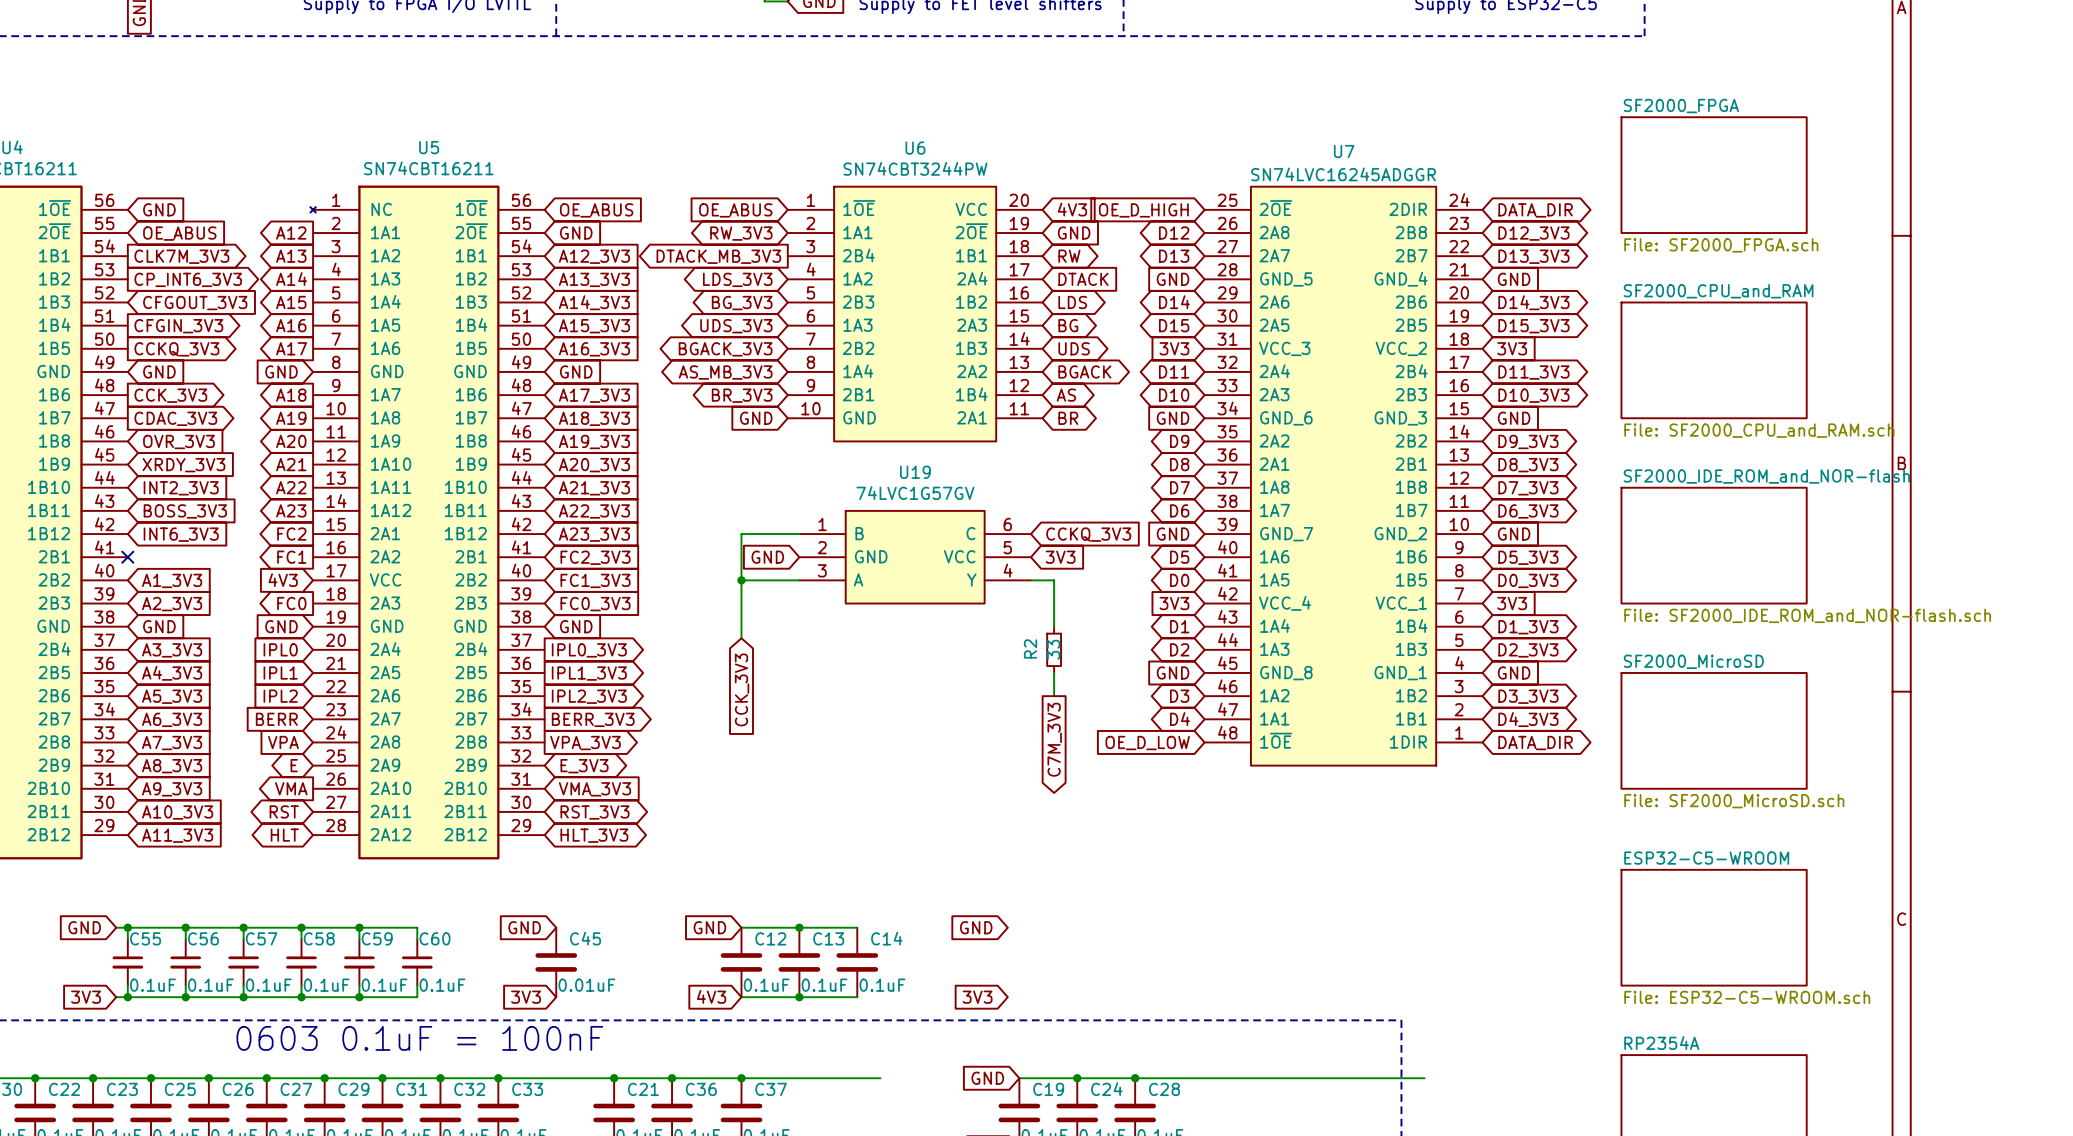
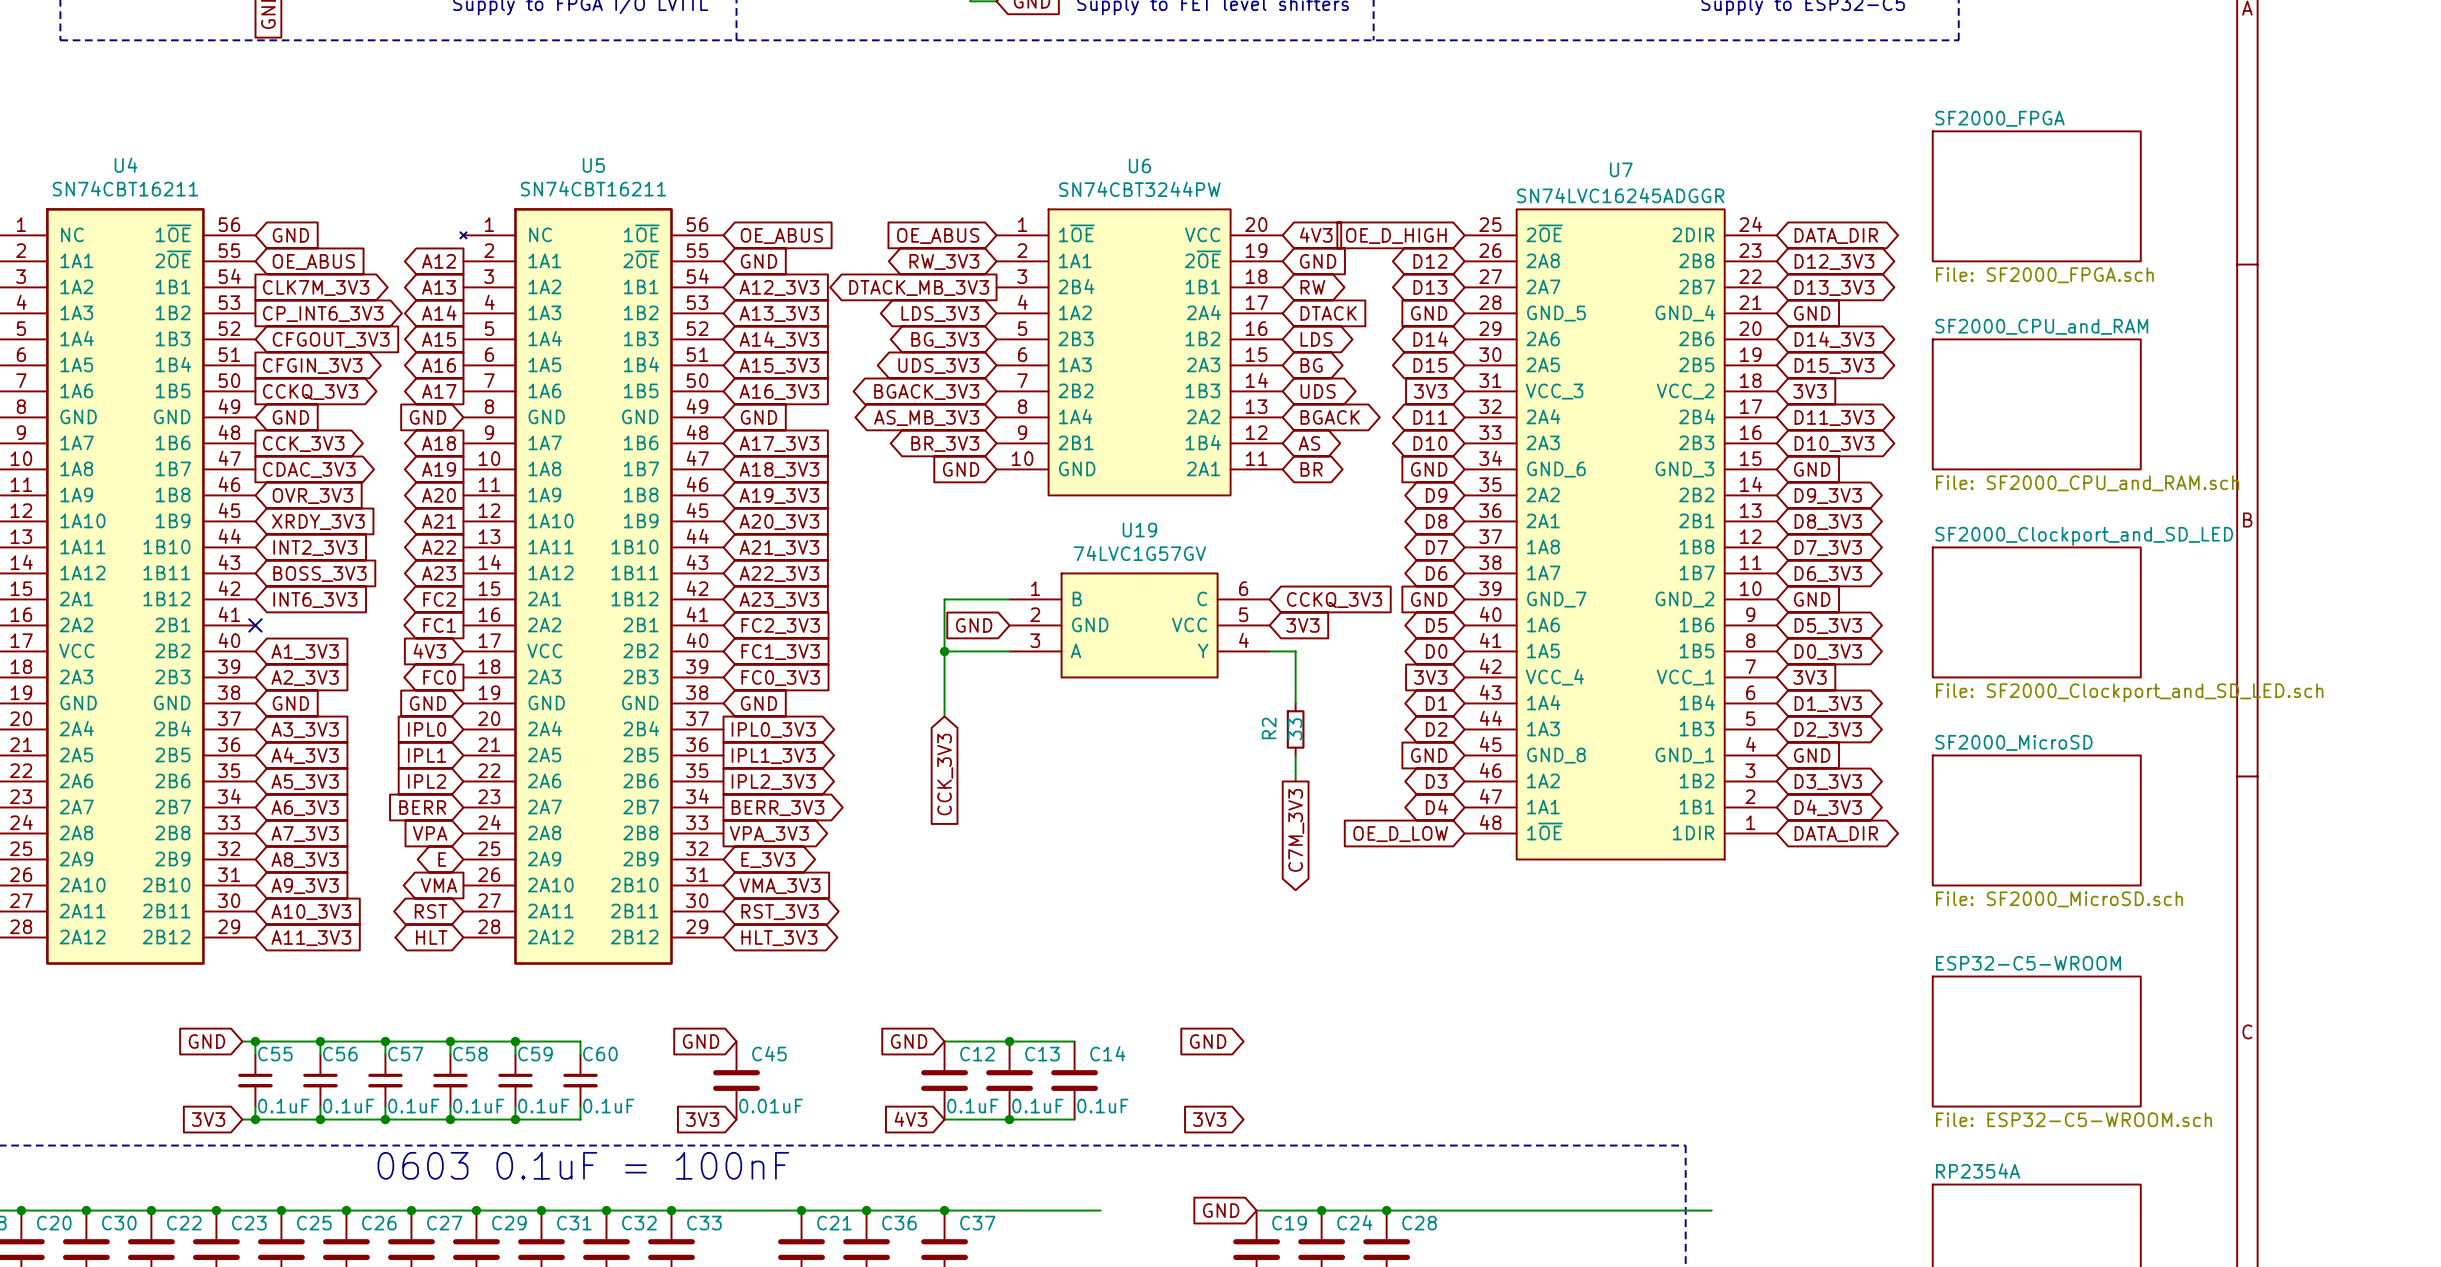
sheet SF2000_IDE_ROM_and_NOR-flash name: SF2000_IDE_ROM_and_NOR-flash (1766, 476) -> SF2000_Clockport_and_SD_LED (2084, 536)
sheet SF2000_IDE_ROM_and_NOR-flash value: File: SF2000_IDE_ROM_and_NOR-flash.sch (1807, 615) -> File: SF2000_Clockport_and_SD_LED.sch (2129, 692)

